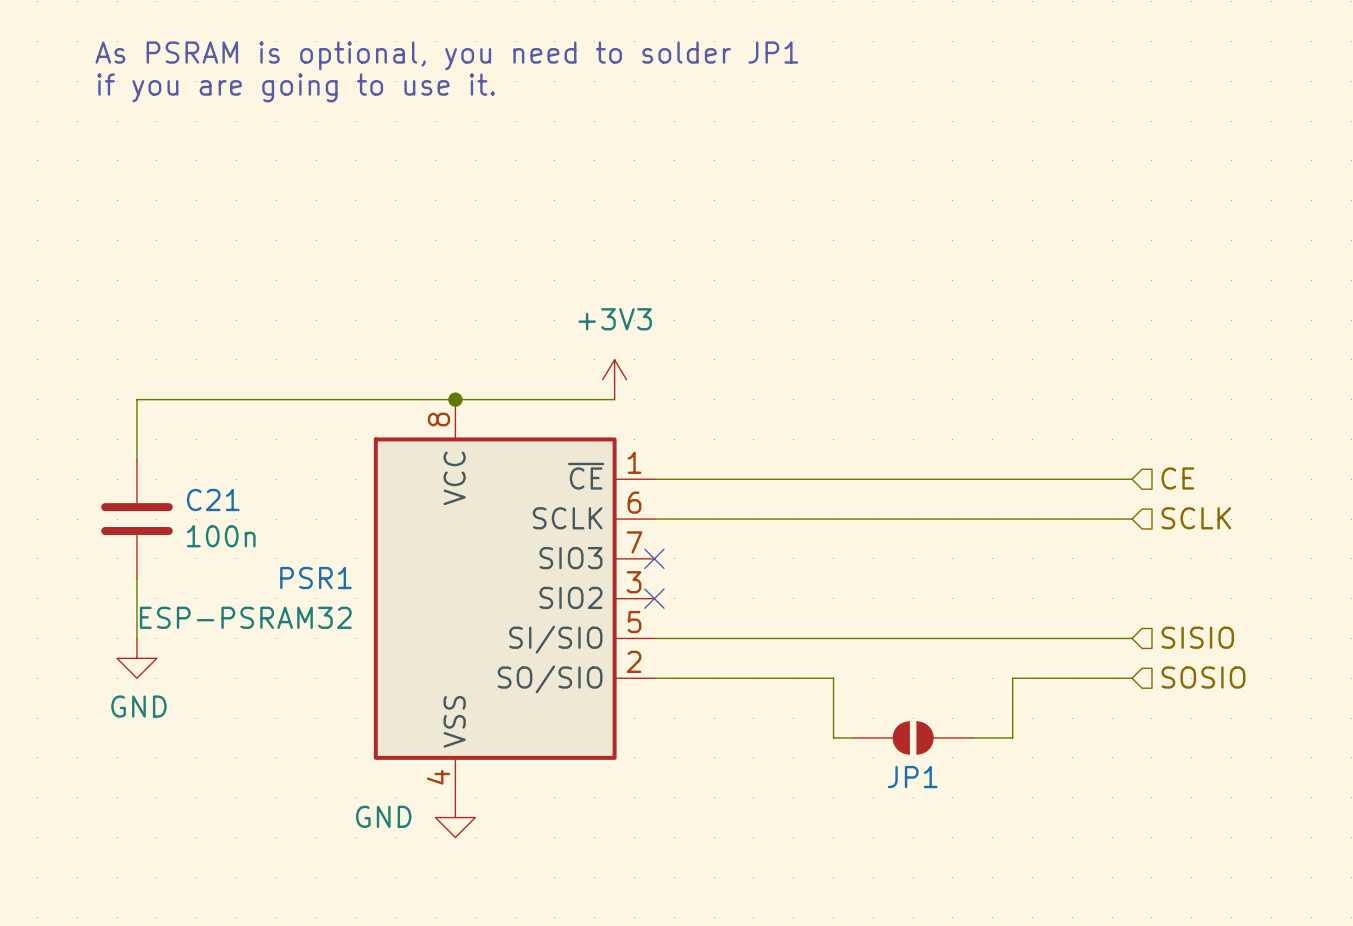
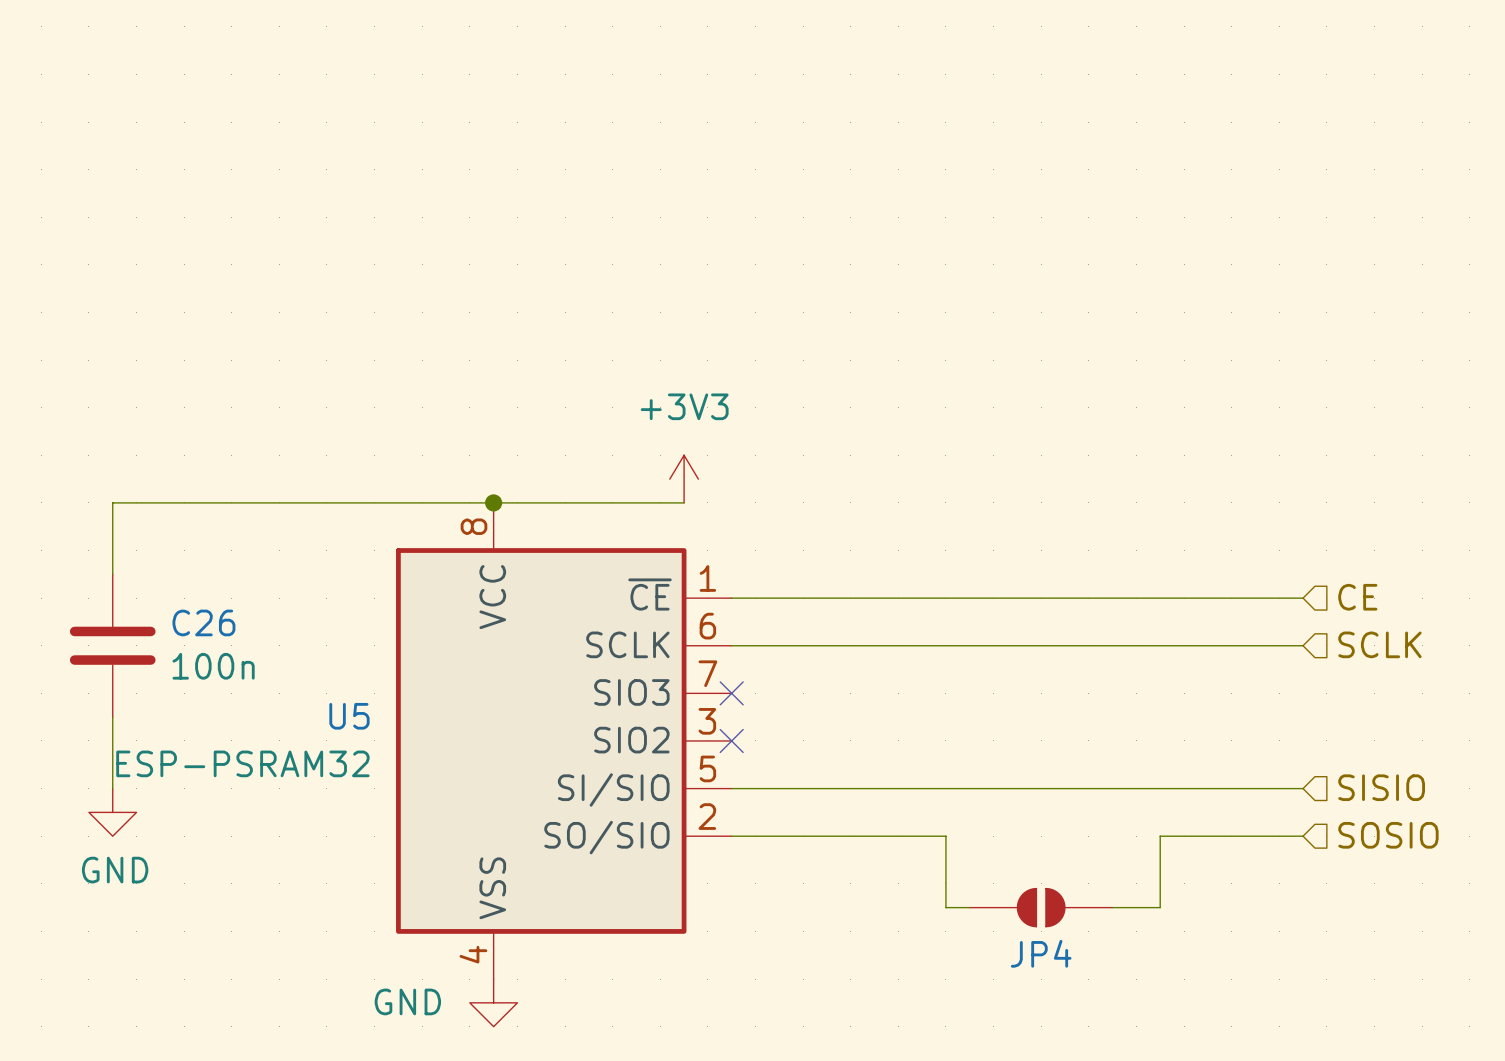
text: As PSRAM is optional, you need to solder JP1 (446, 55) -> none
text: if you are going to use it. (296, 87) -> none
C21 name: C21 (213, 499) -> C26 (203, 622)
PSR1 name: PSR1 (315, 578) -> U5 (349, 716)
JP1 name: JP1 (912, 777) -> JP4 (1041, 953)

